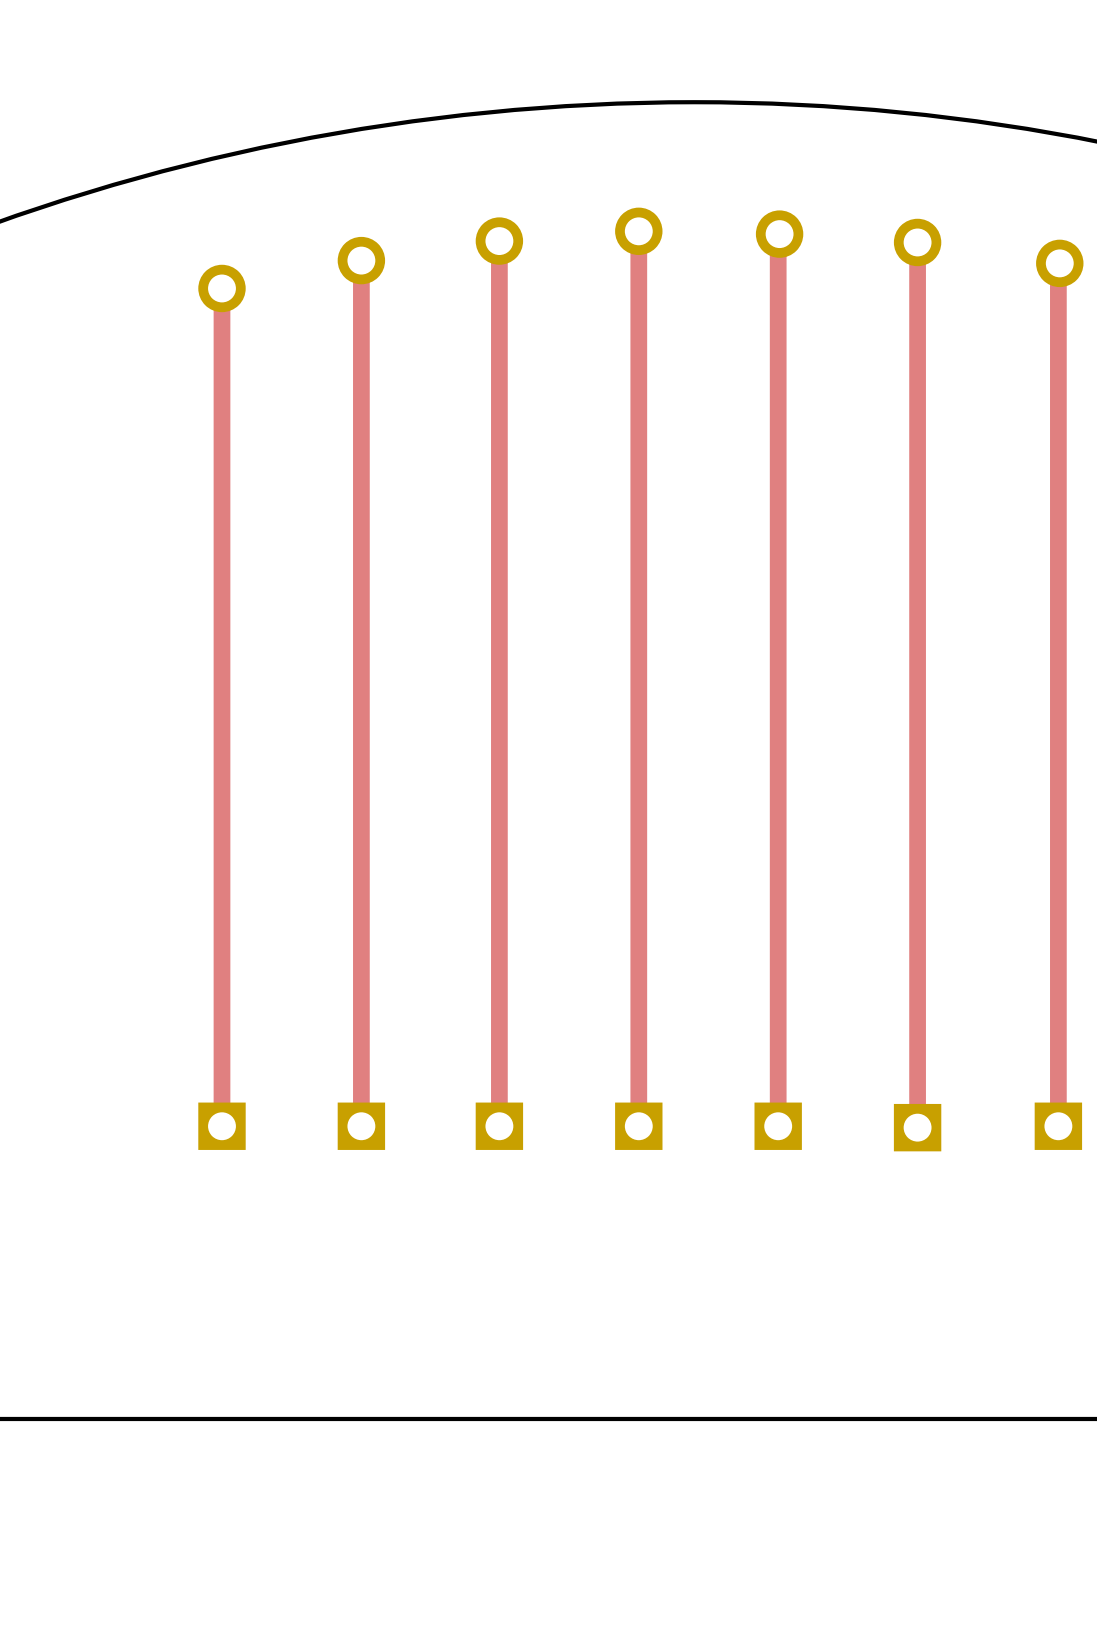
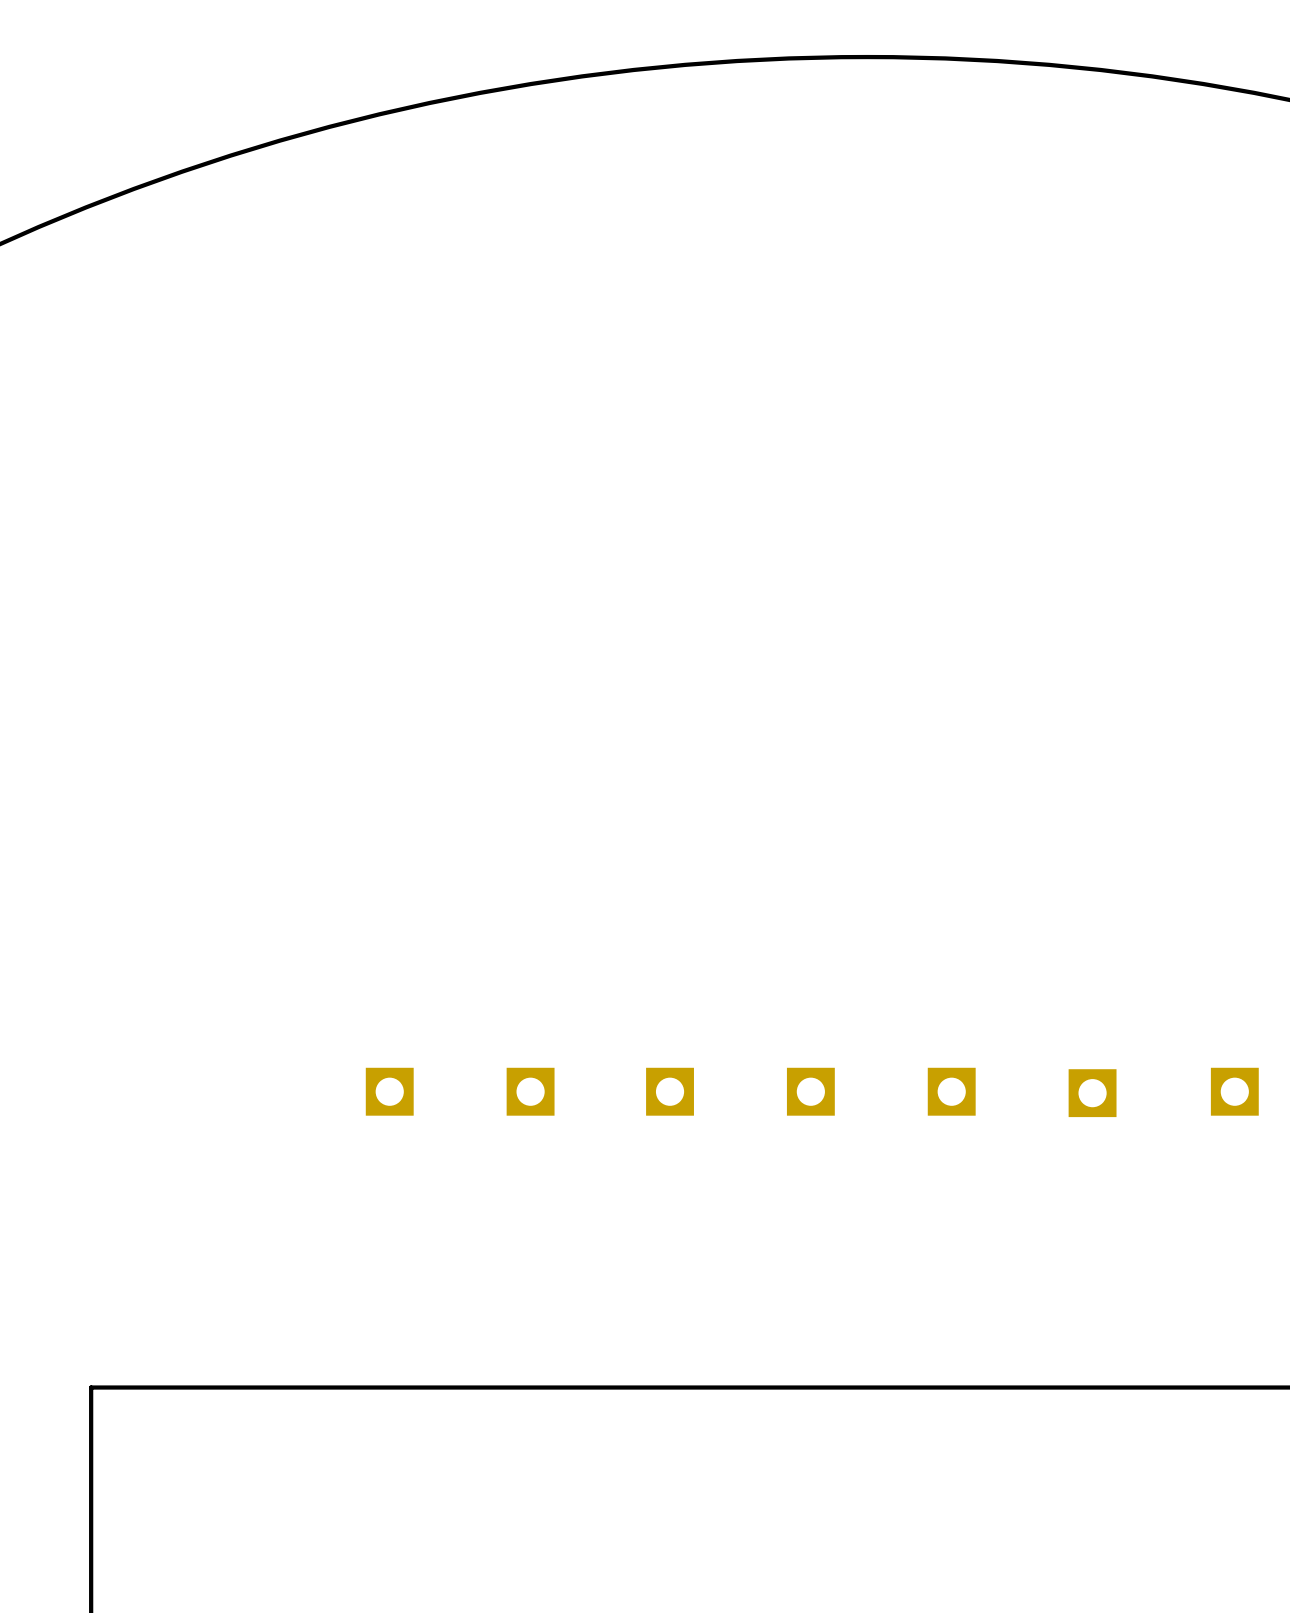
part: (638, 231) -> none
part: (779, 234) -> none
top track: (638, 235) (638, 1126) -> none
top track: (776, 236) (778, 1126) -> none
part: (499, 241) -> none
top track: (499, 242) (499, 1126) -> none
part: (917, 242) -> none
top track: (917, 243) (917, 1127) -> none
top track: (359, 260) (361, 1126) -> none
part: (361, 260) -> none
part: (1059, 263) -> none
top track: (1059, 266) (1058, 1126) -> none
part: (221, 288) -> none
top track: (223, 291) (221, 1126) -> none

